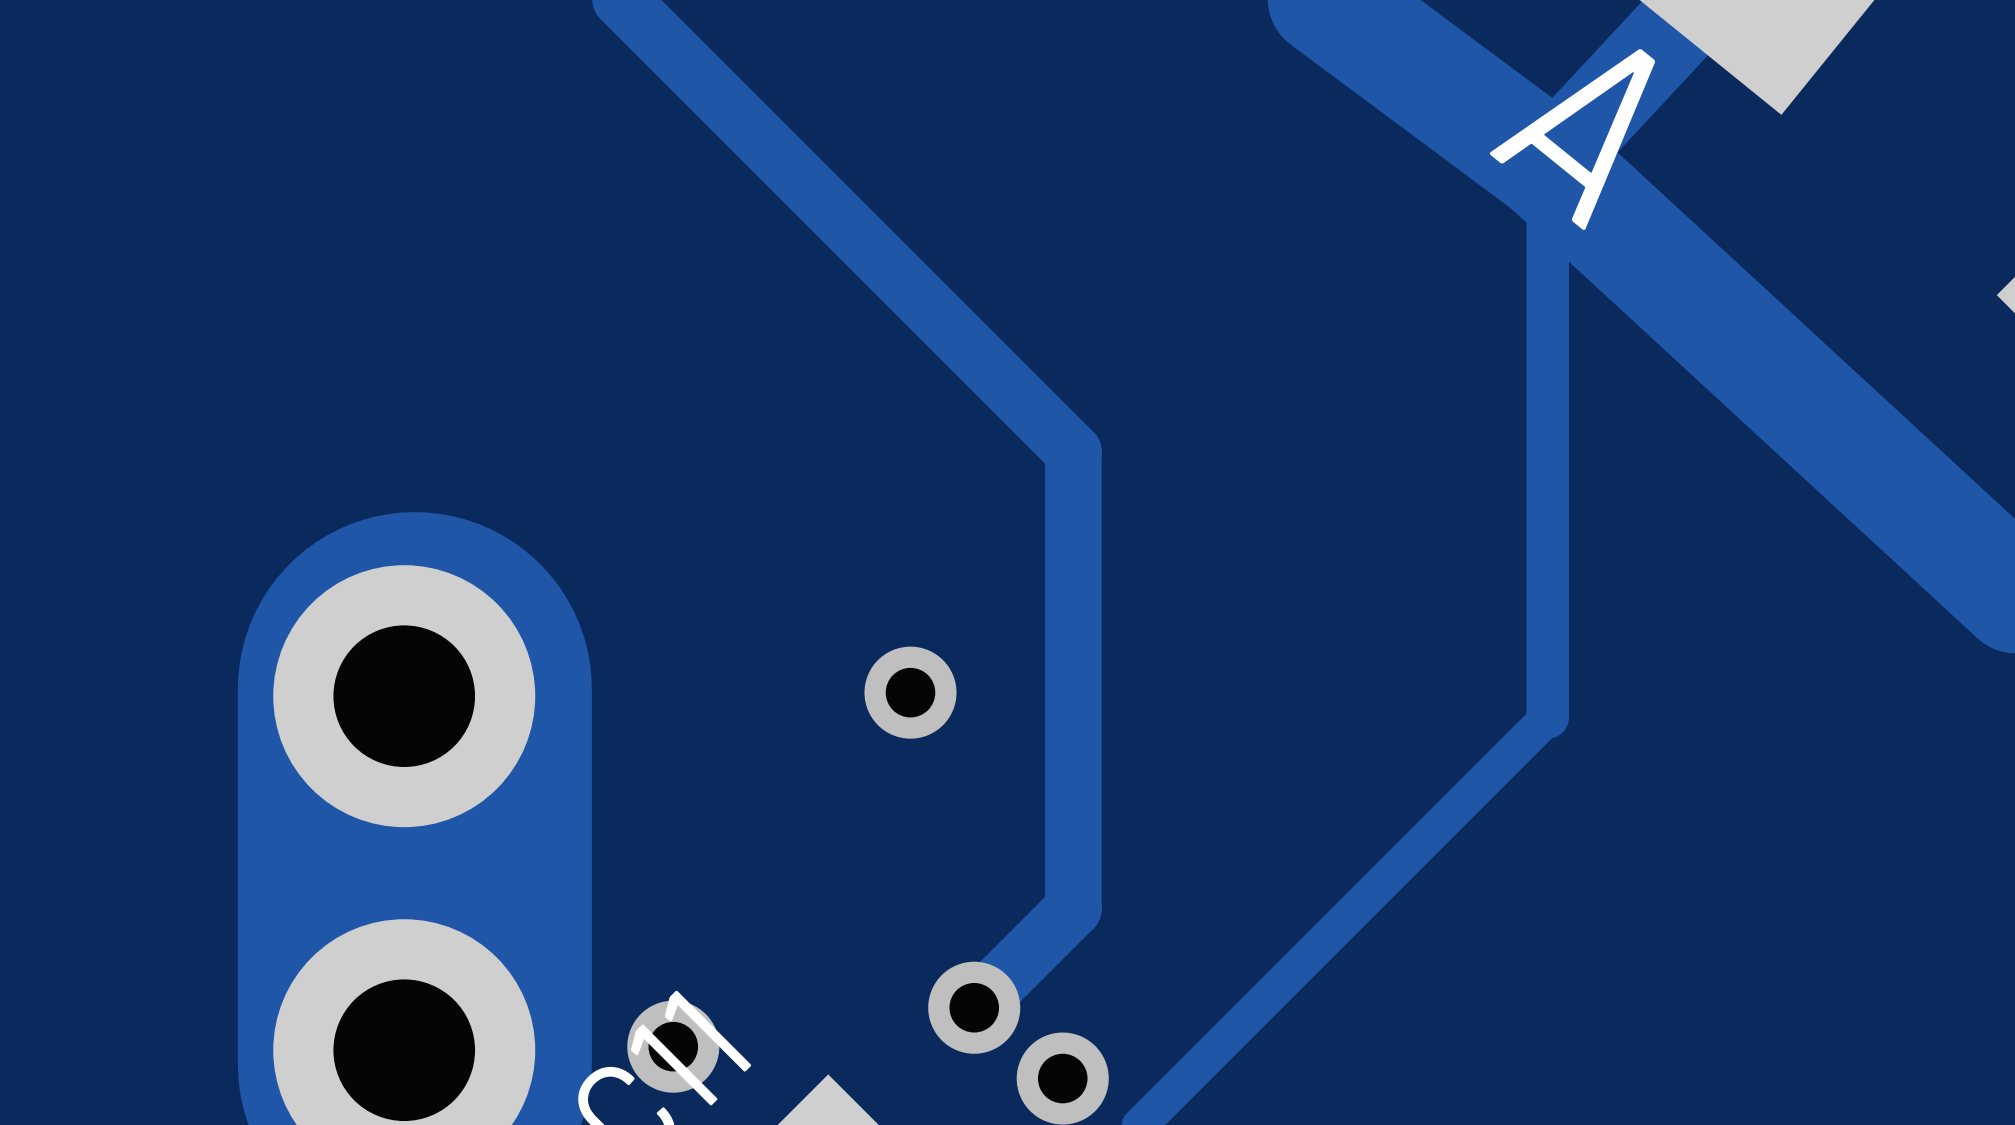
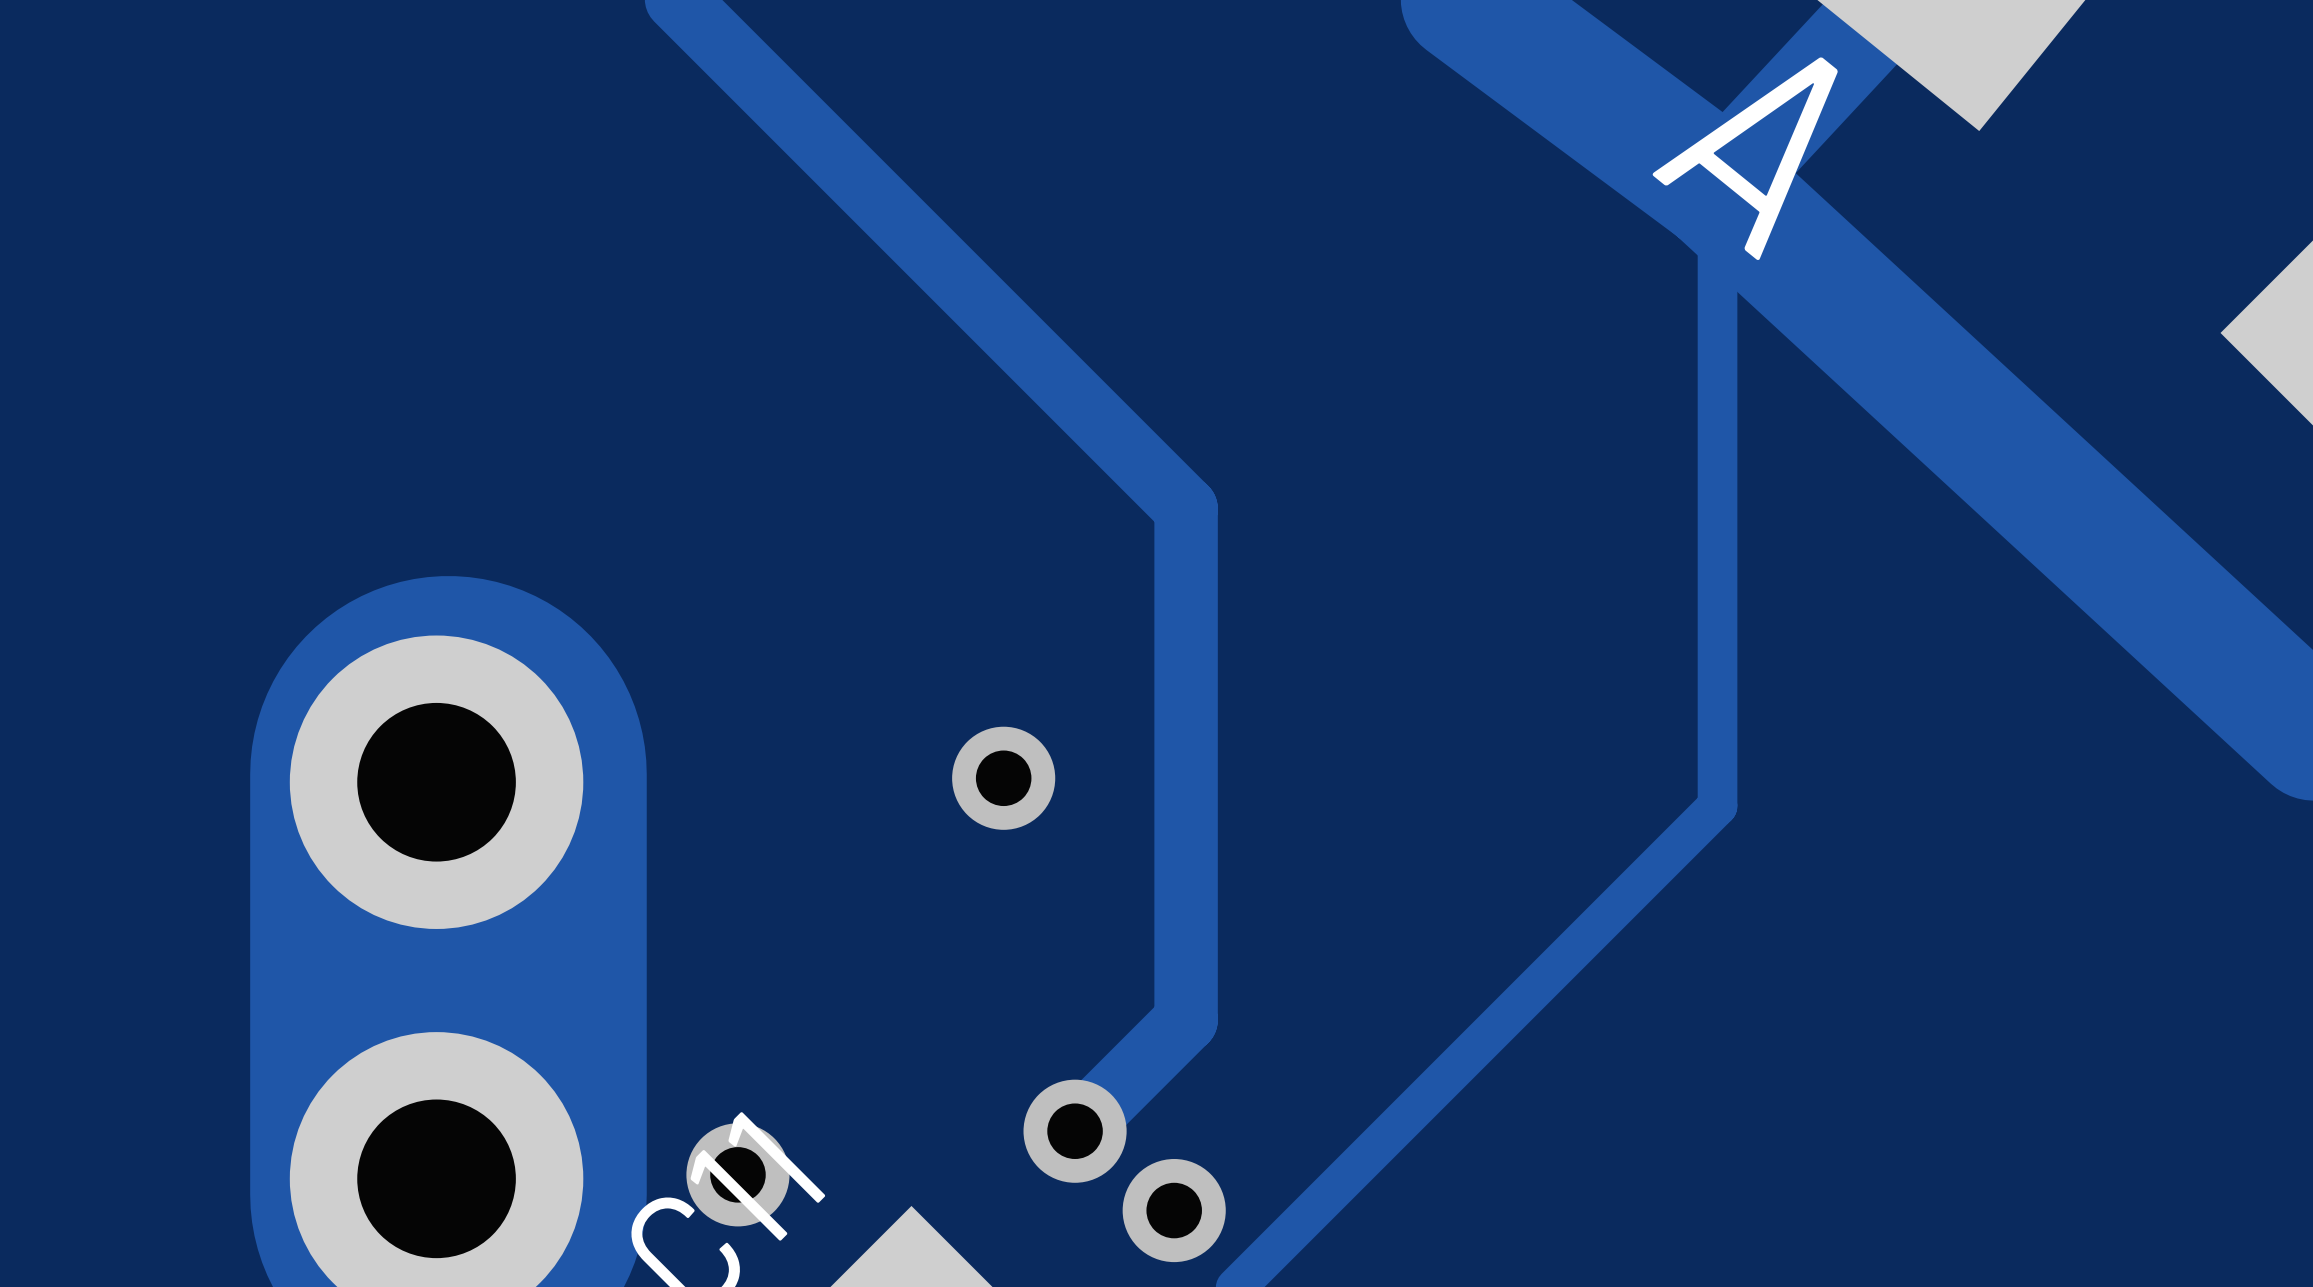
track width: thick (1547, 165) (1547, 717) -> thin (1717, 187) (1717, 806)

